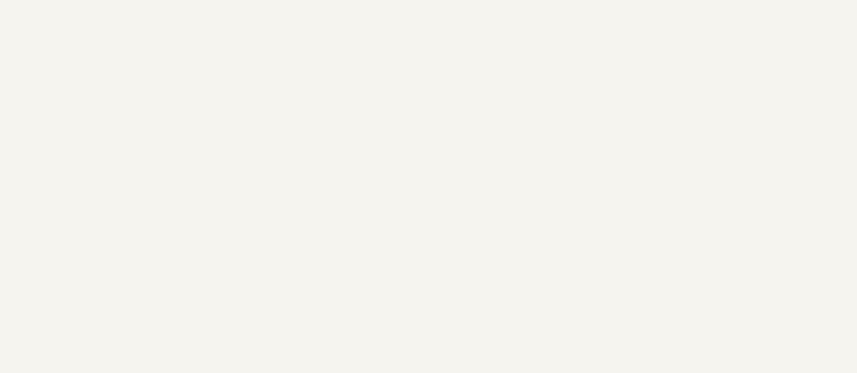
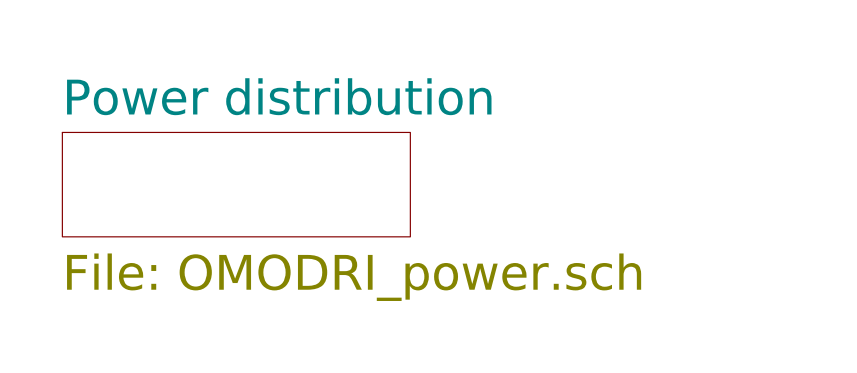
sheet Power distribution: none -> File: OMODRI_power.sch (236, 184)

